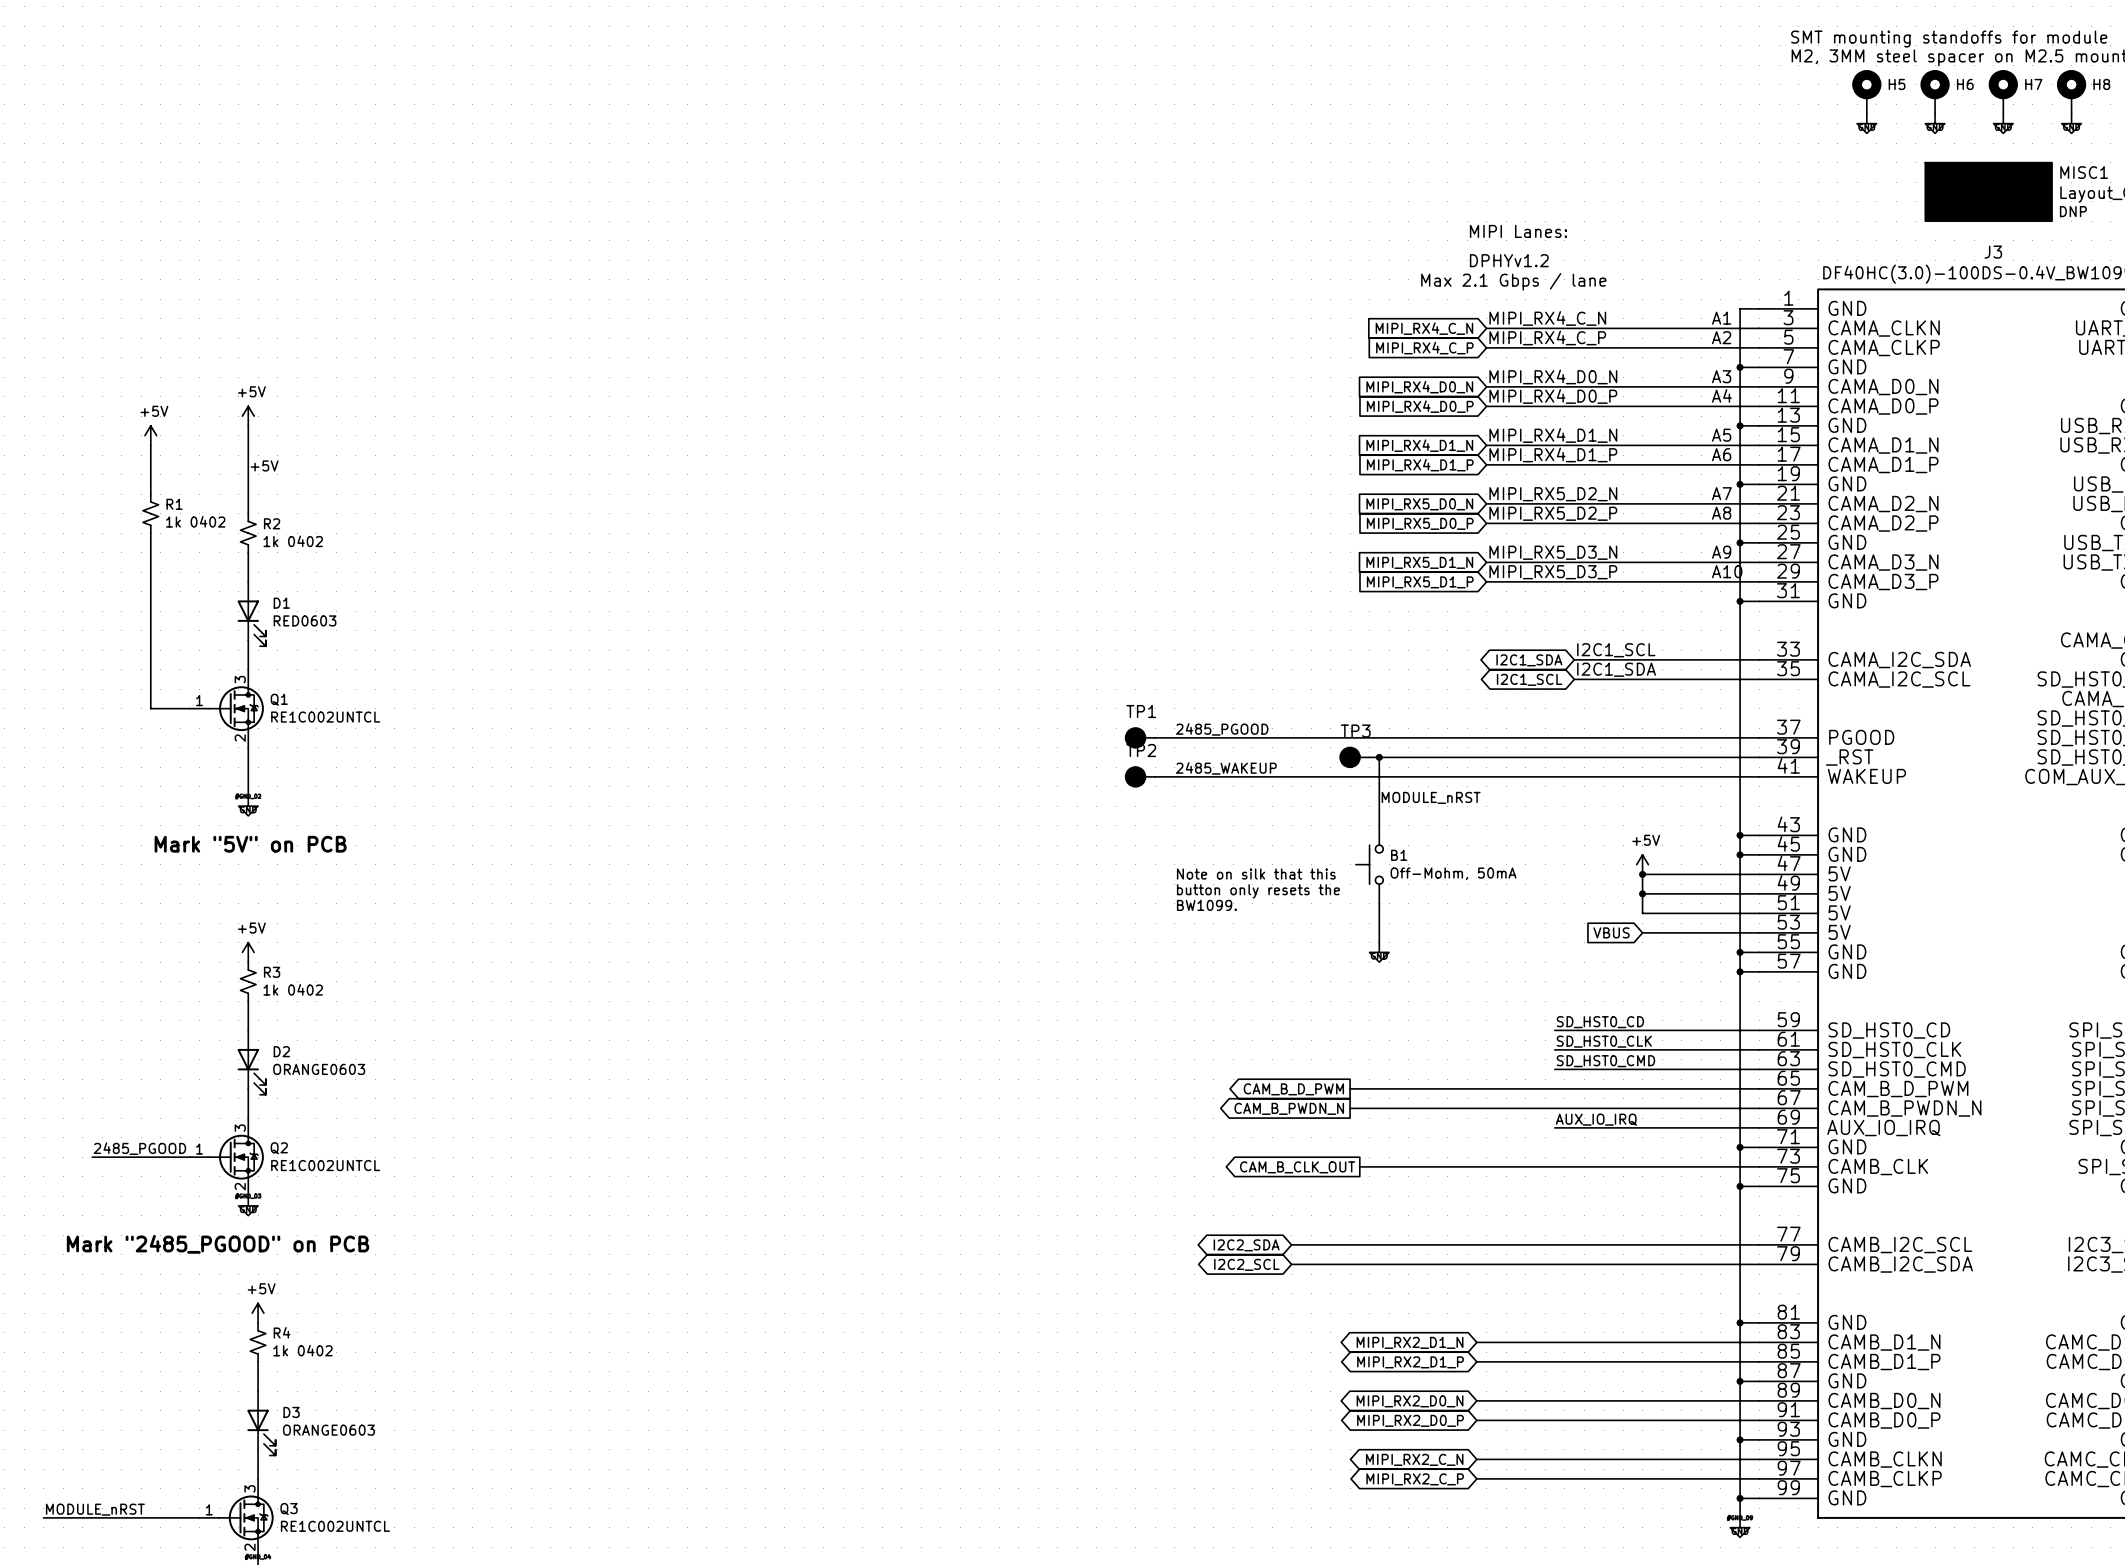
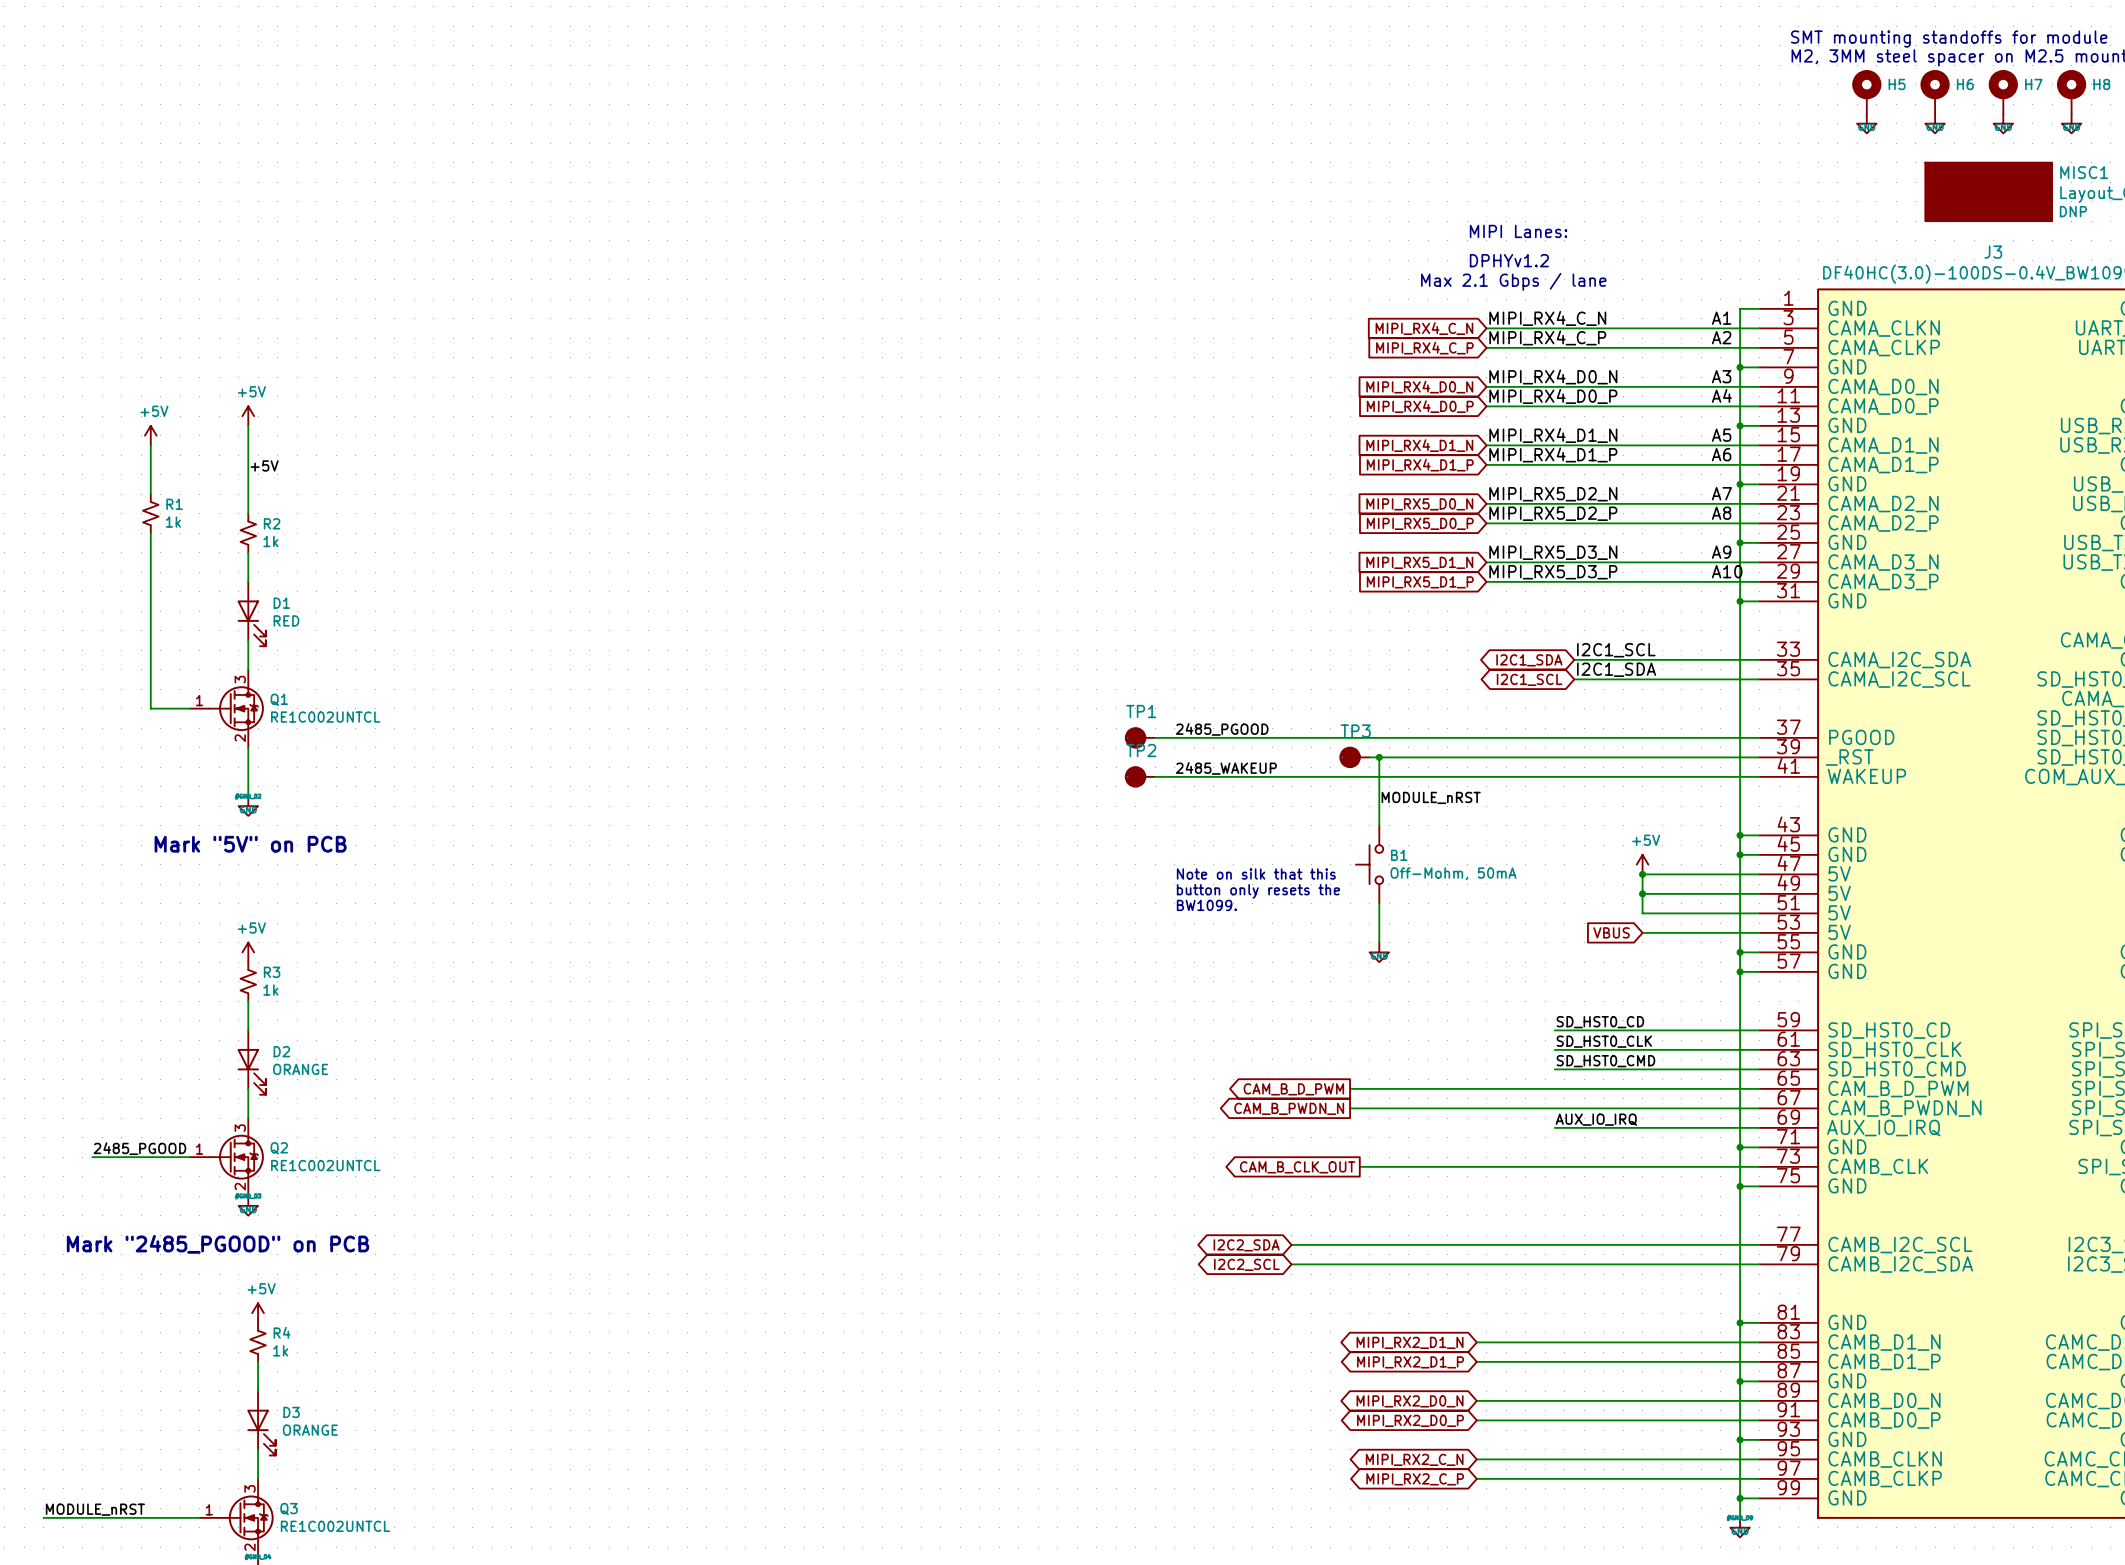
R1 value: 1k 0402 (195, 521) -> 1k (173, 522)
R2 value: 1k 0402 (293, 541) -> 1k (270, 541)
D1 value: RED0603 (305, 620) -> RED (286, 620)
R3 value: 1k 0402 (293, 989) -> 1k (270, 990)
D2 value: ORANGE0603 (319, 1069) -> ORANGE (300, 1069)
R4 value: 1k 0402 (302, 1350) -> 1k (280, 1350)
D3 value: ORANGE0603 (328, 1430) -> ORANGE (310, 1430)

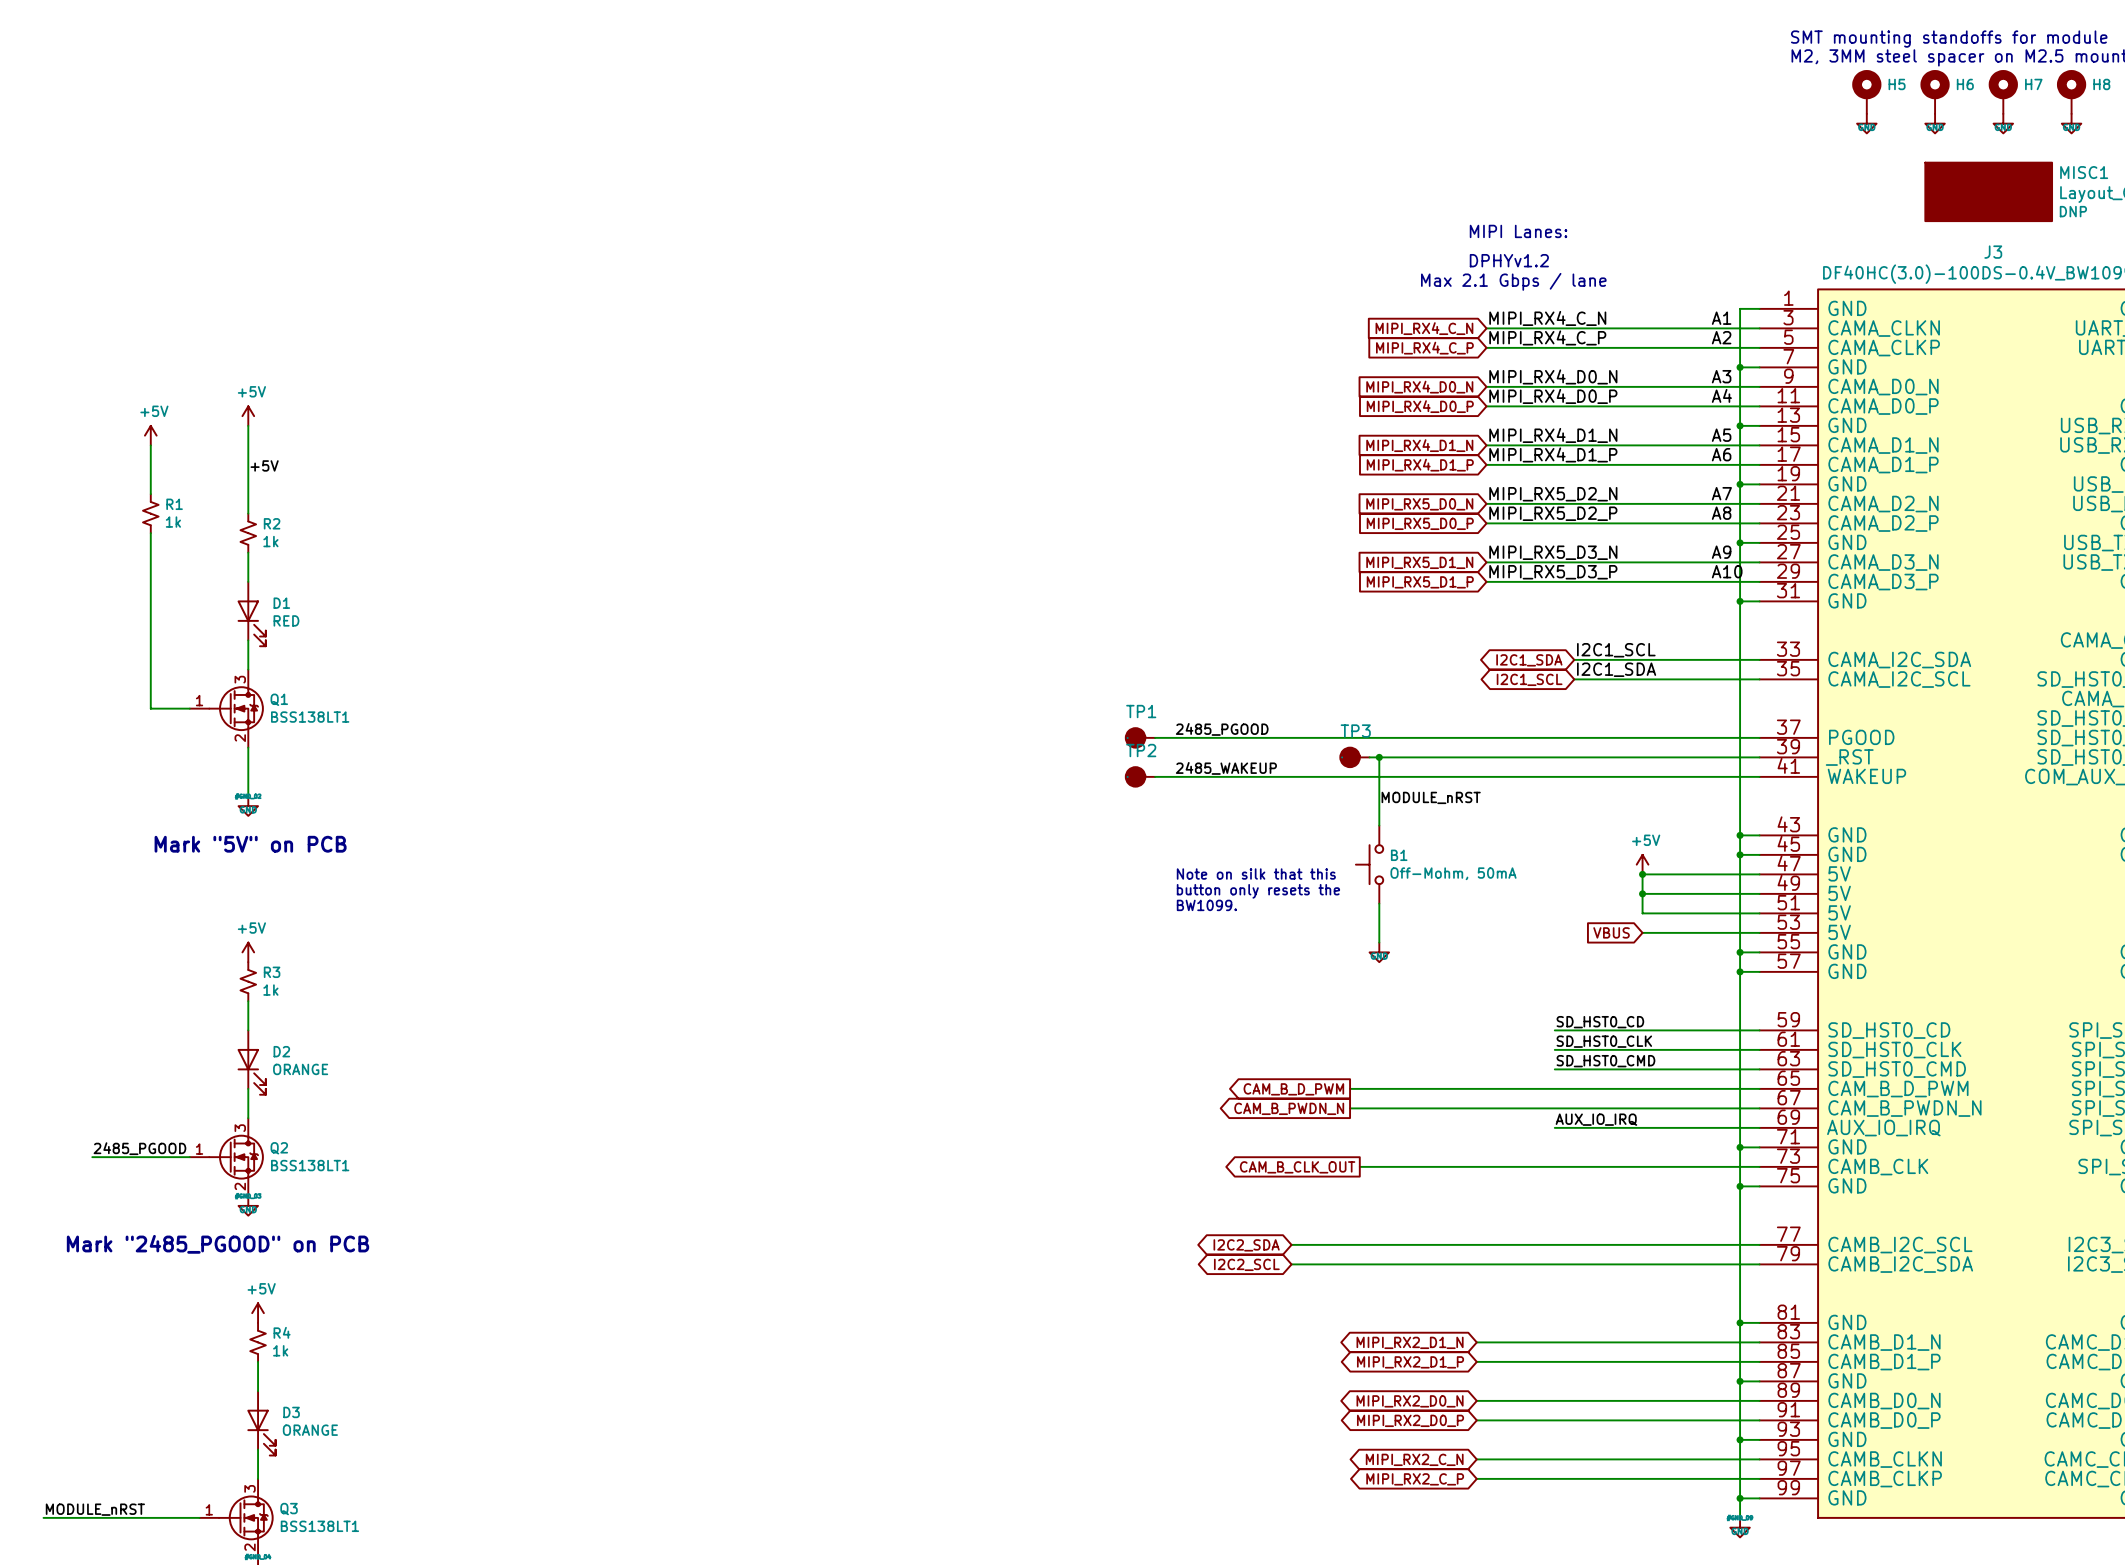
Q1 value: RE1C002UNTCL (325, 717) -> BSS138LT1 (310, 717)
Q2 value: RE1C002UNTCL (325, 1165) -> BSS138LT1 (310, 1165)
Q3 value: RE1C002UNTCL (335, 1526) -> BSS138LT1 (319, 1526)

